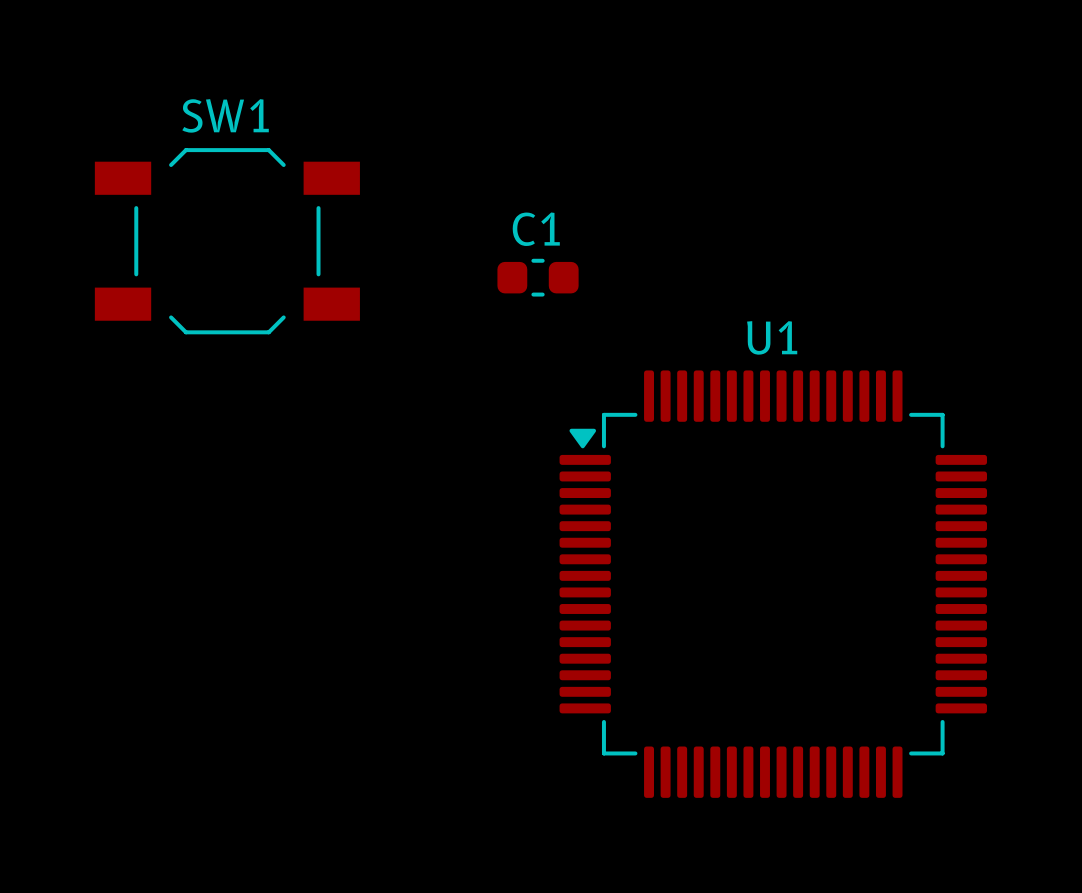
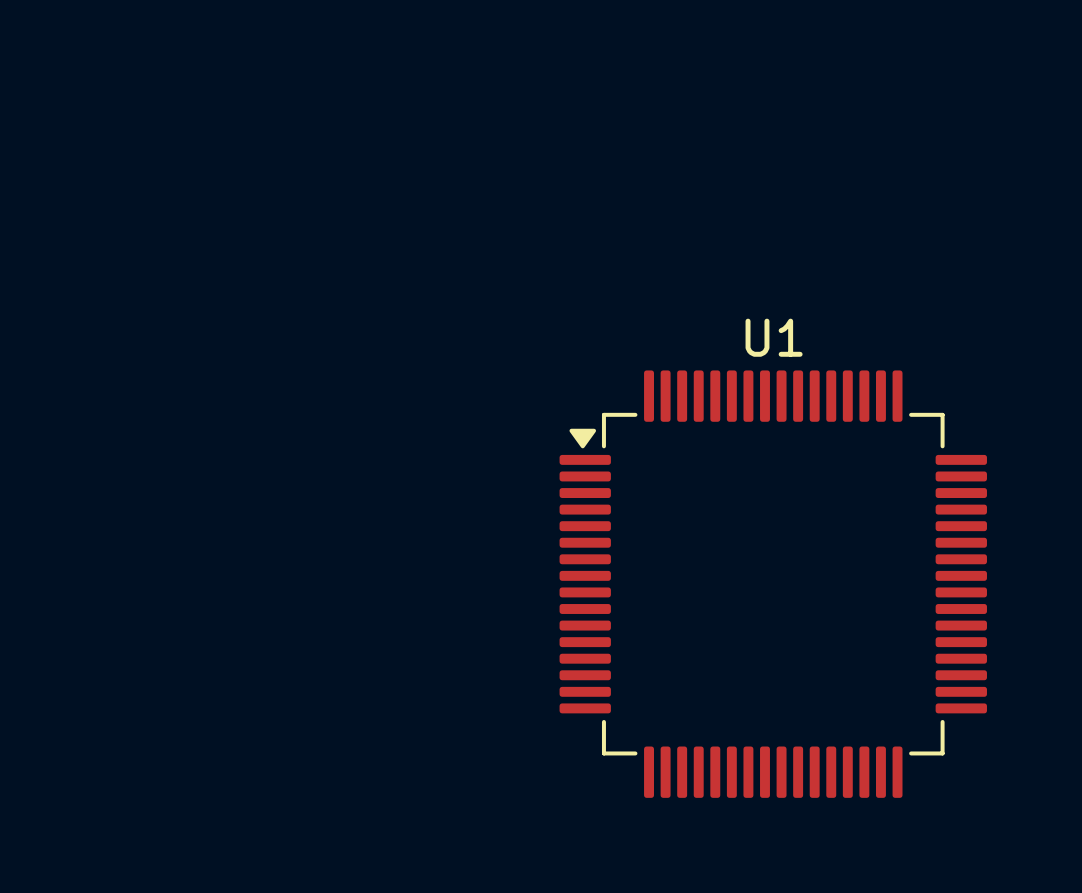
SW1: (227, 241) -> none
C1: (538, 277) -> none

